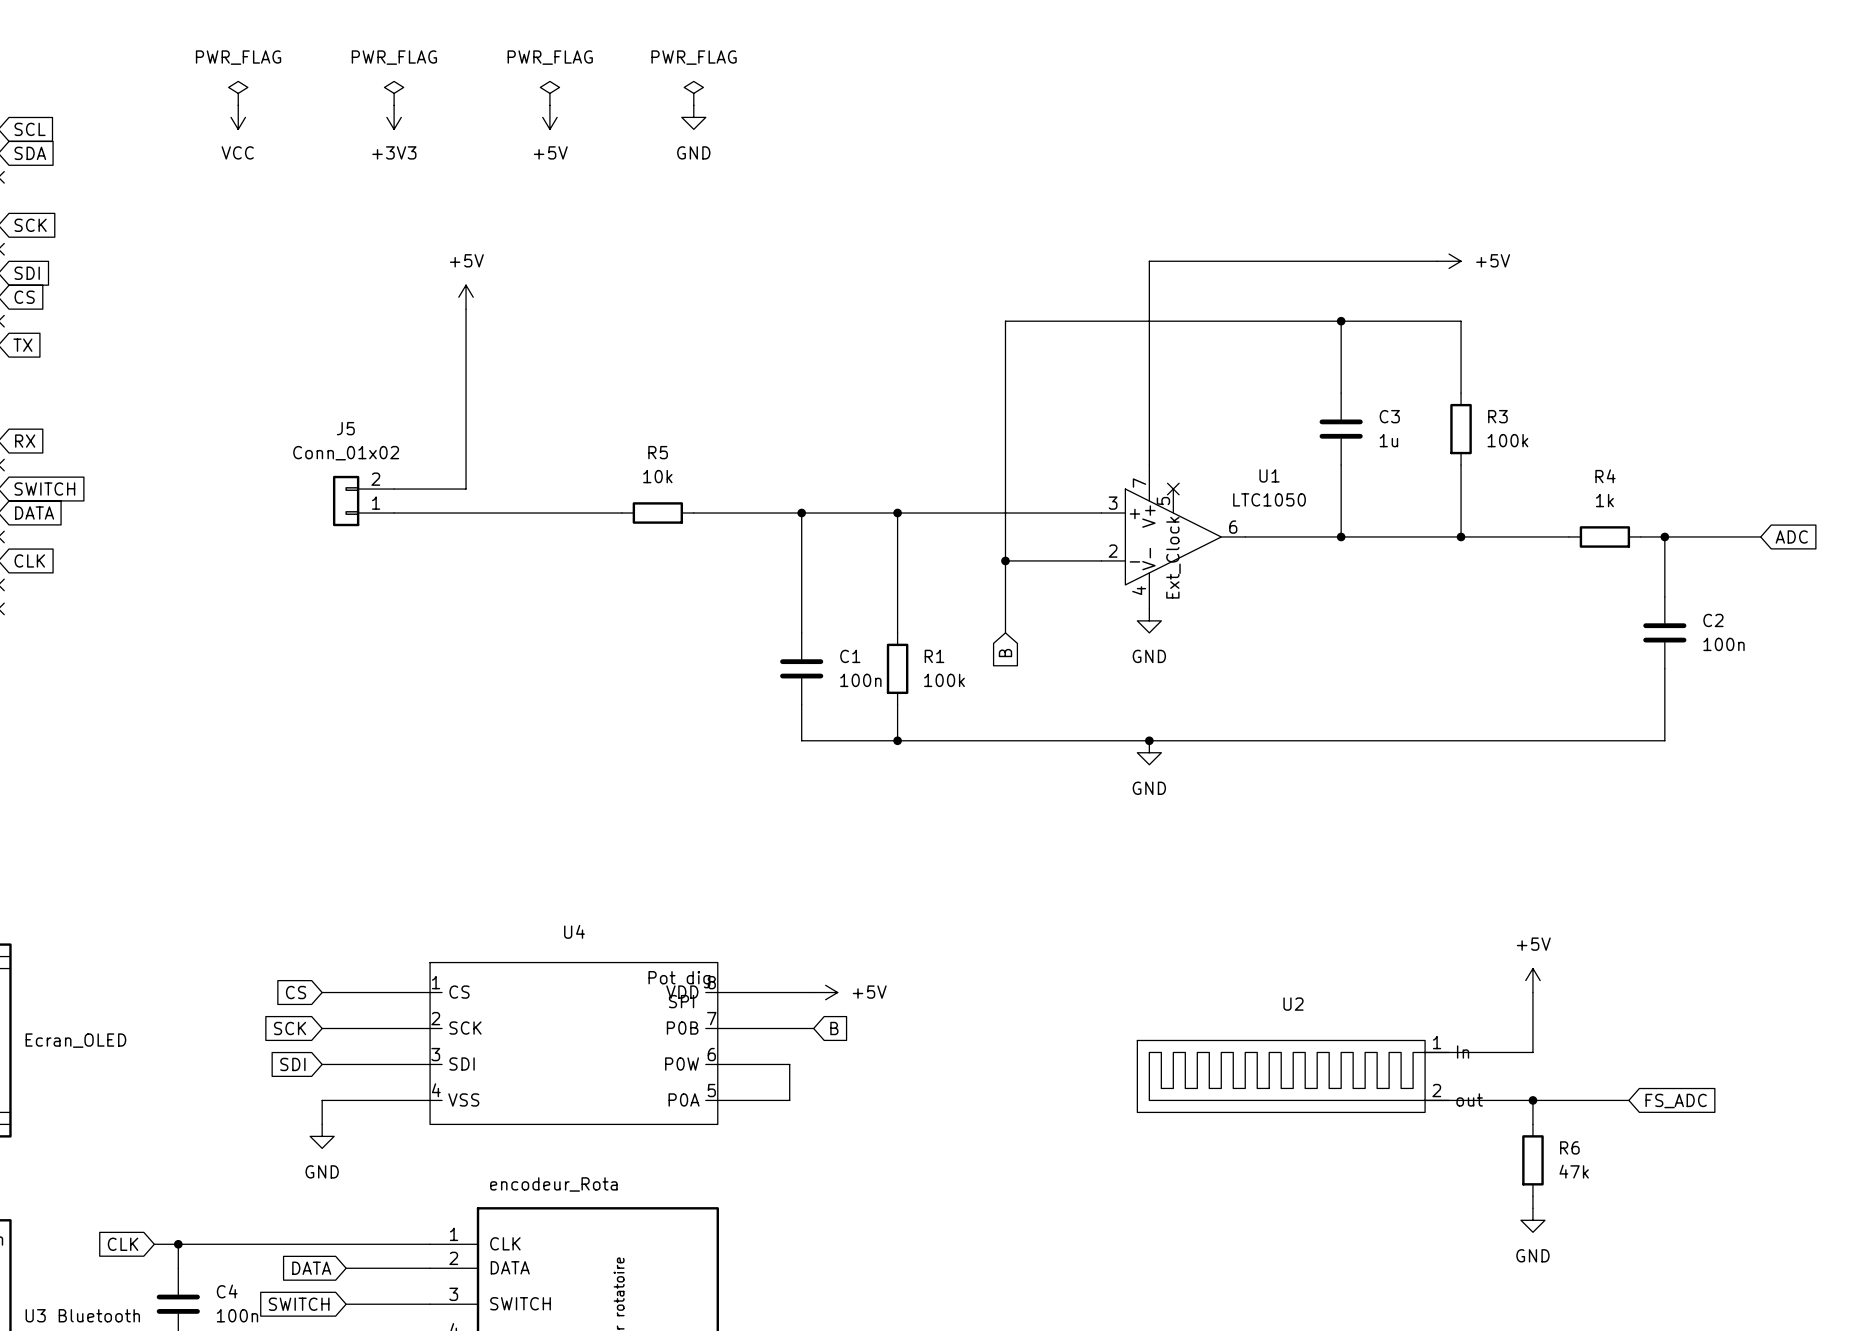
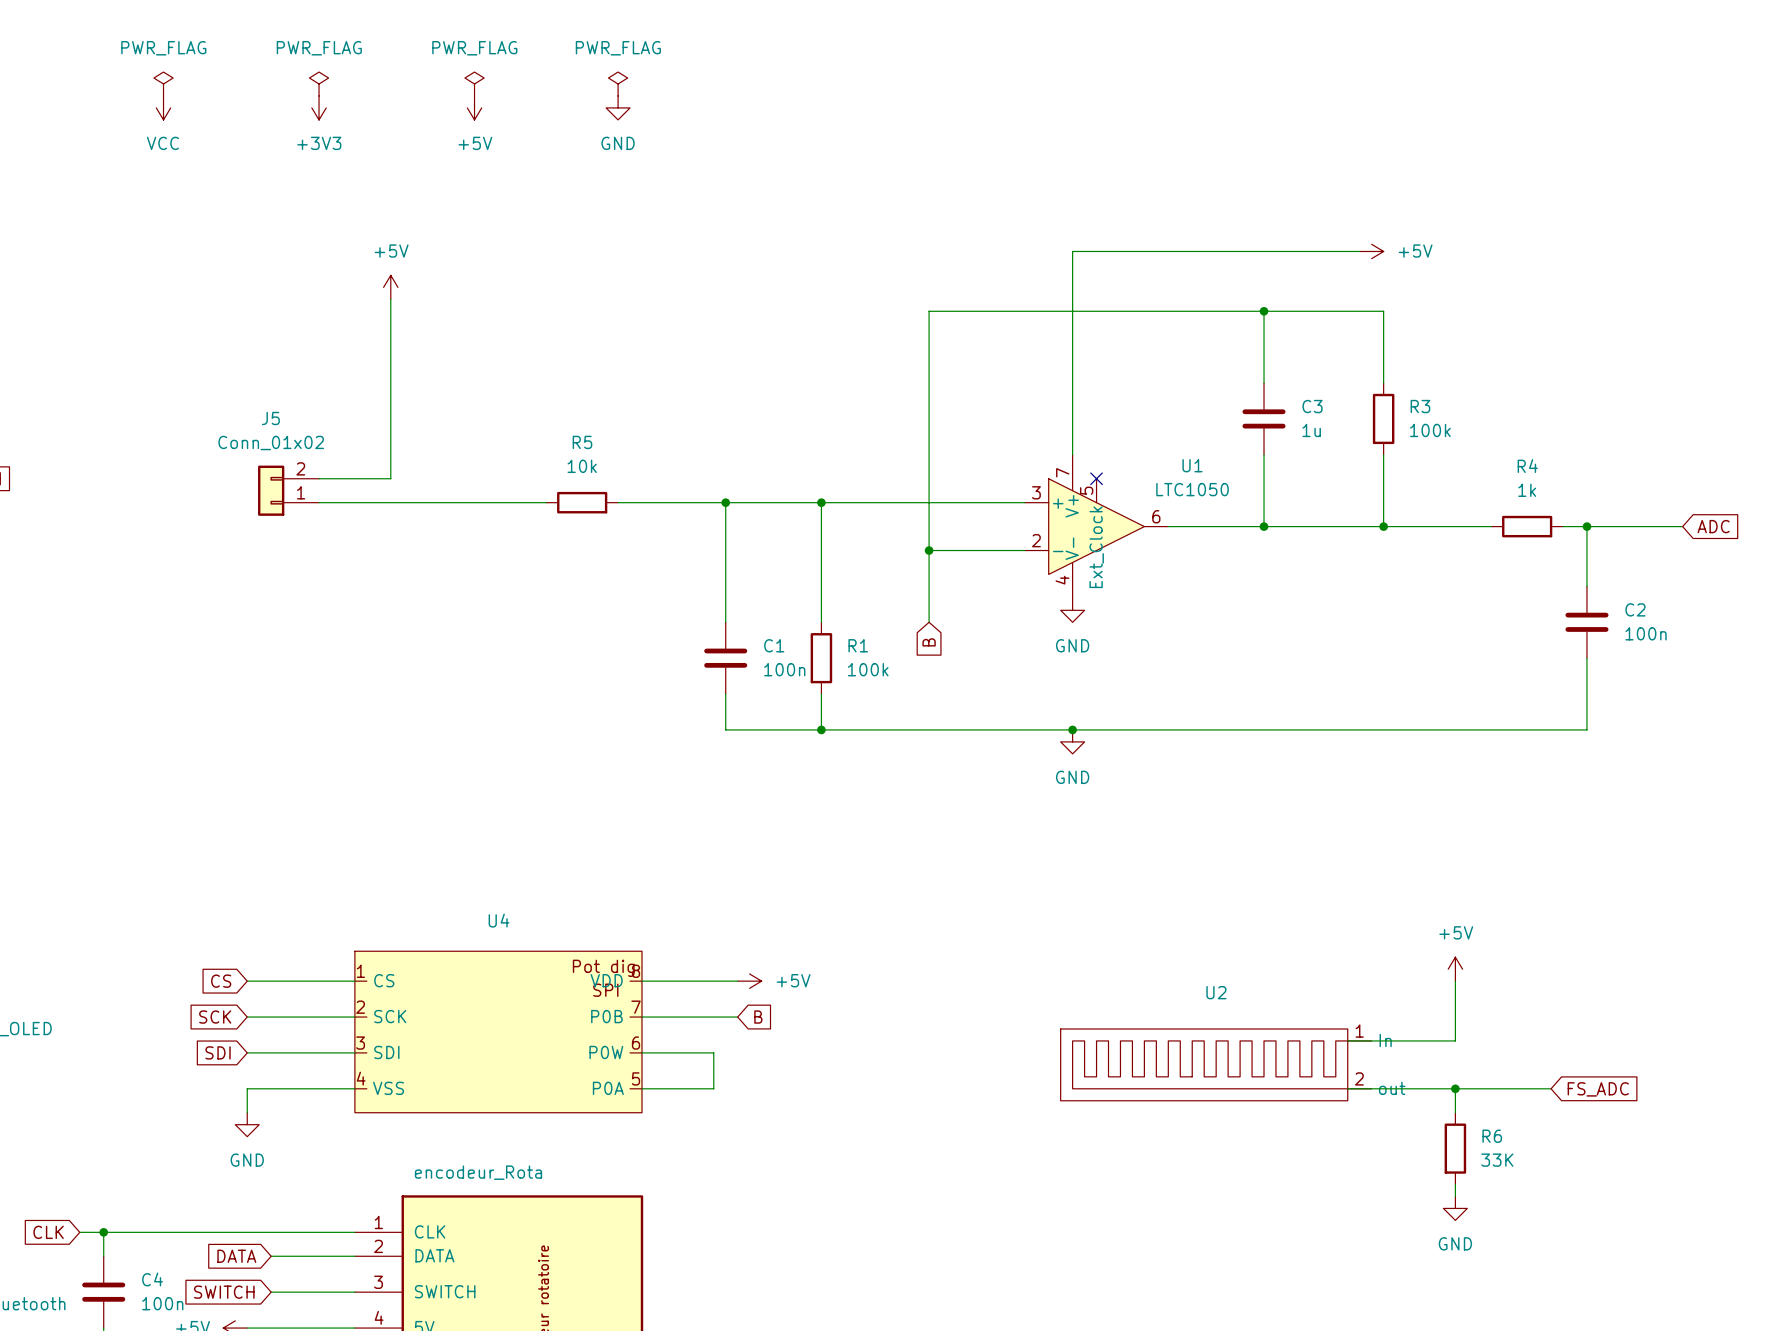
R6 value: 47k (1574, 1171) -> 33K (1497, 1160)

